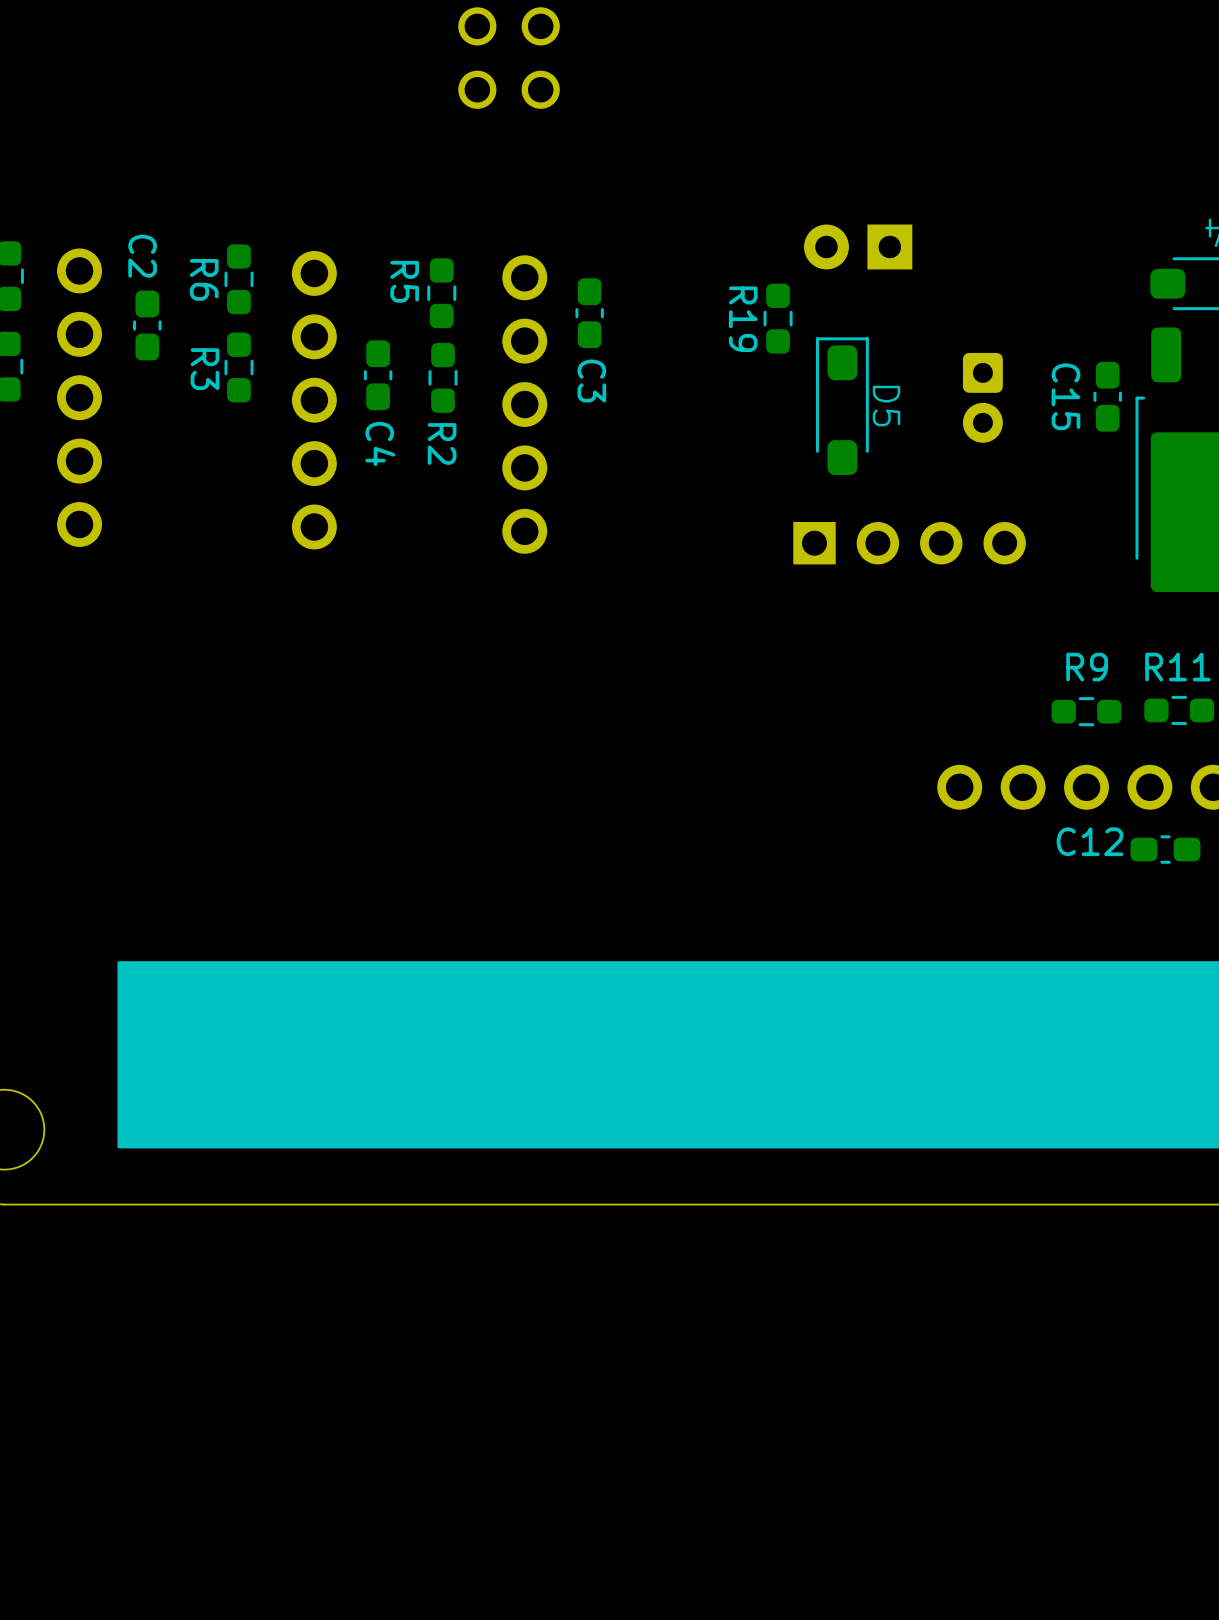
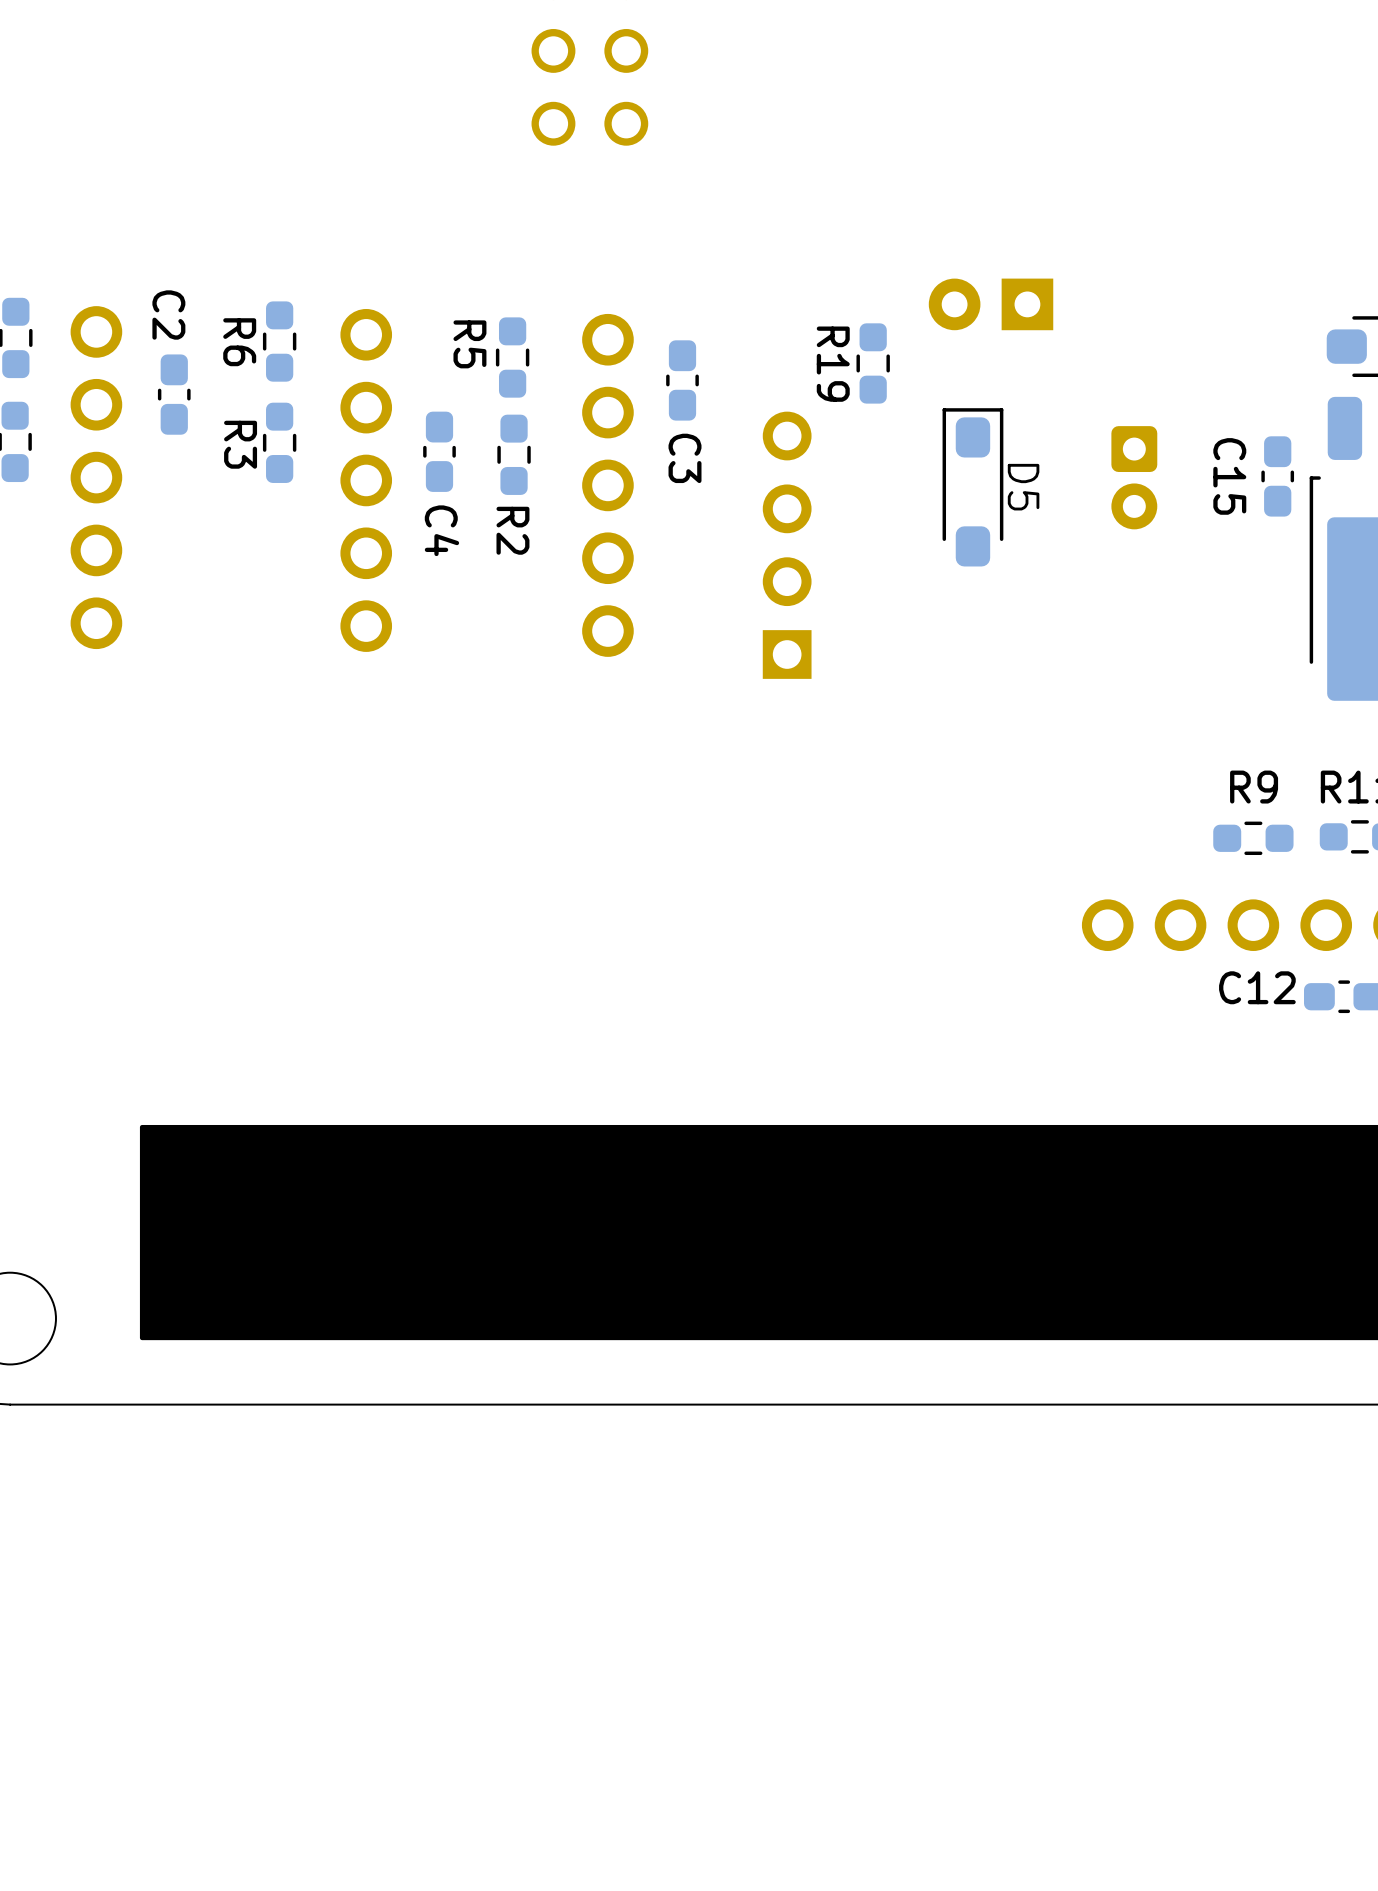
R19 position: (778, 318) -> (873, 363)
part rotation: 0° (909, 543) -> 90° counterclockwise (787, 545)
part position: (909, 543) -> (787, 545)

